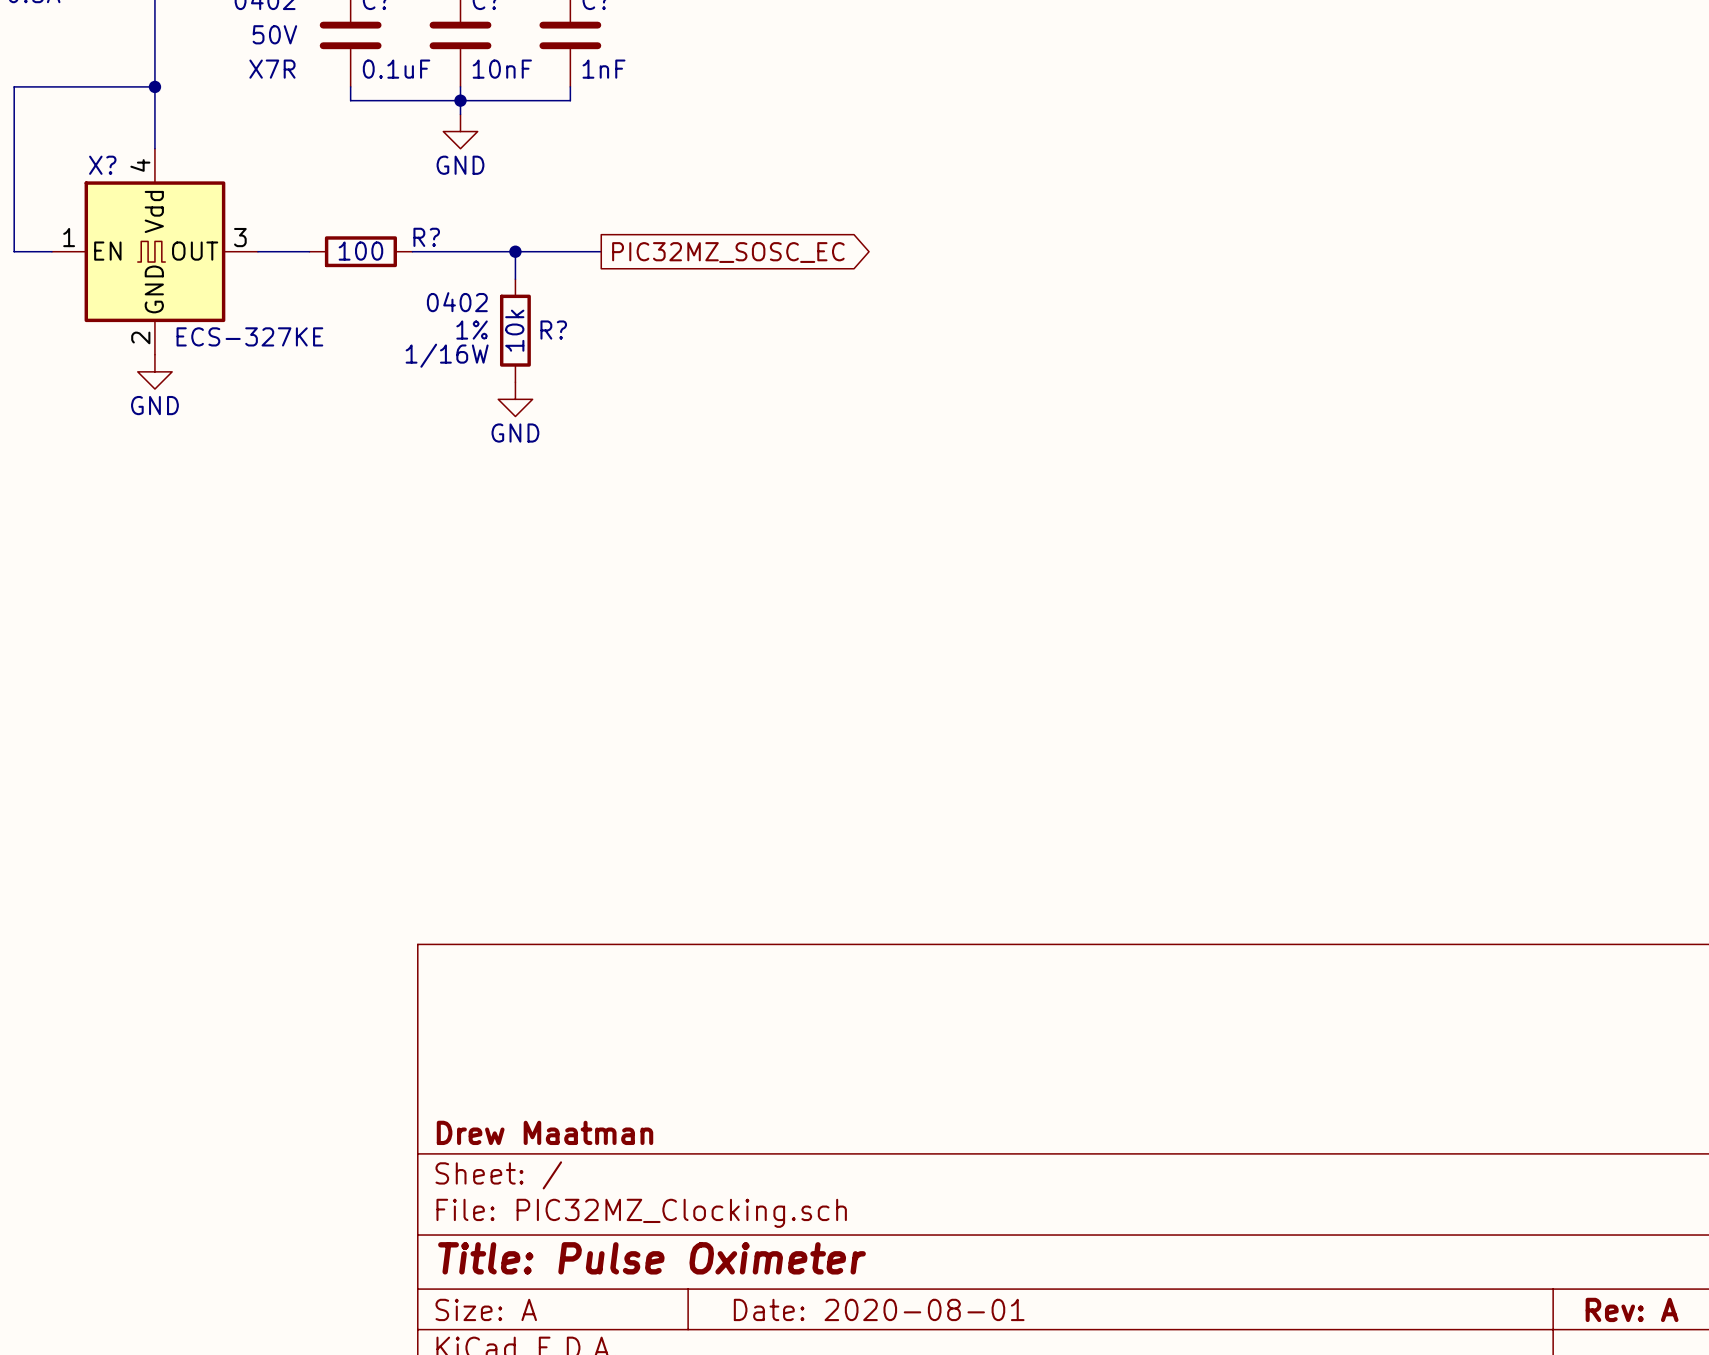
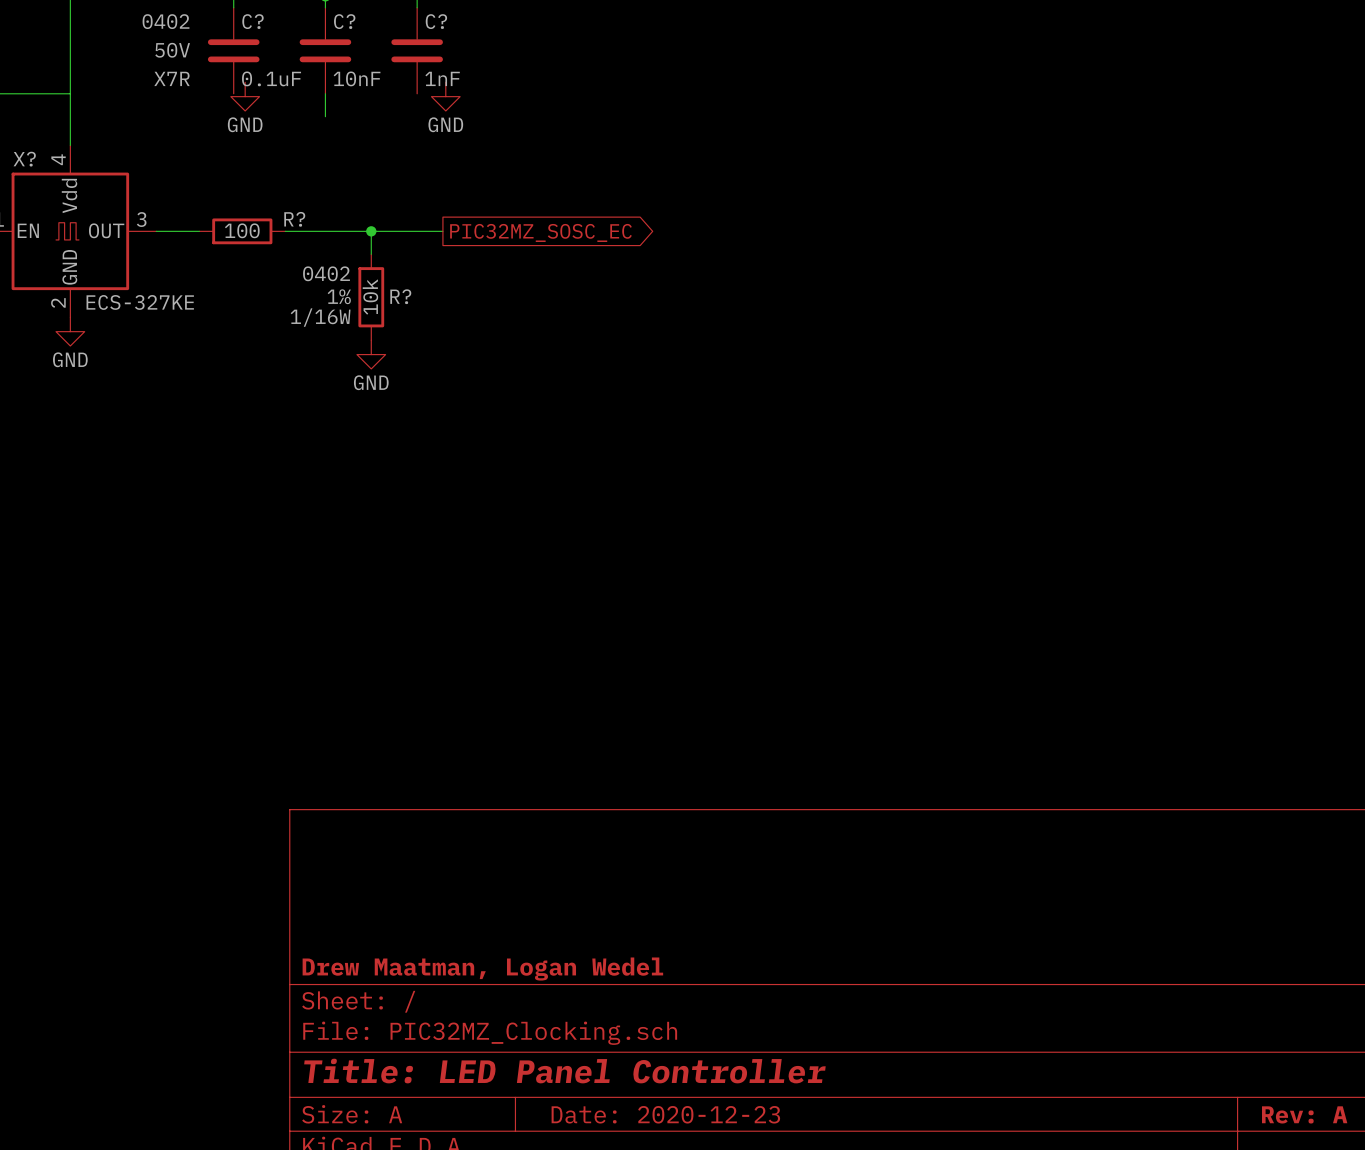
junction: (154, 86) -> none
wire: (350, 86) (350, 100) (570, 100) (570, 86) -> none
power symbol: none -> GND (245, 96)
power symbol: none -> GND (445, 96)
junction: (460, 100) -> none
power symbol: GND (460, 131) -> none
title block: Drew Maatman (544, 1132) -> Drew Maatman, Logan Wedel (482, 969)
title block: Title: Pulse Oximeter (652, 1258) -> Title: LED Panel Controller (564, 1071)
title block: Date: 2020-08-01 (879, 1309) -> Date: 2020-12-23 (665, 1114)

